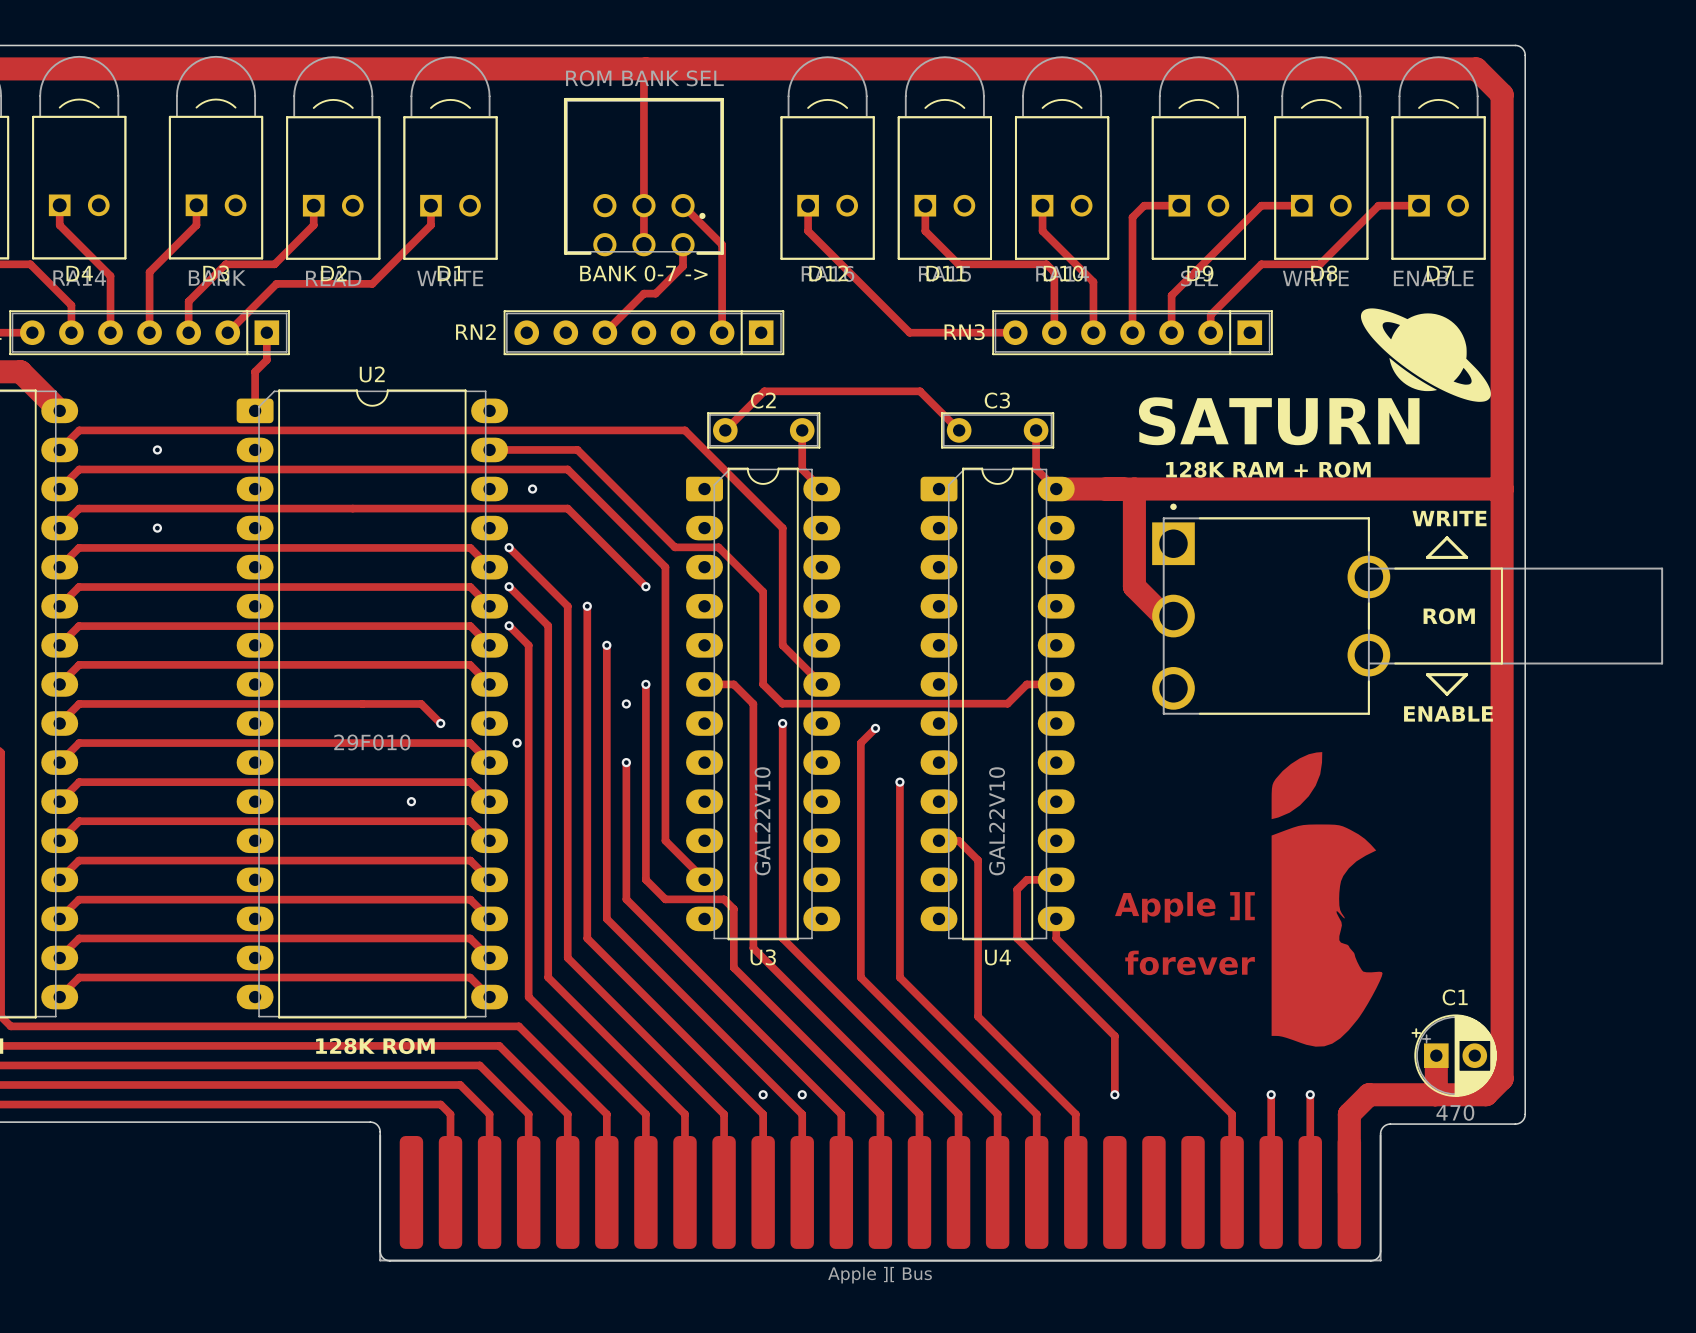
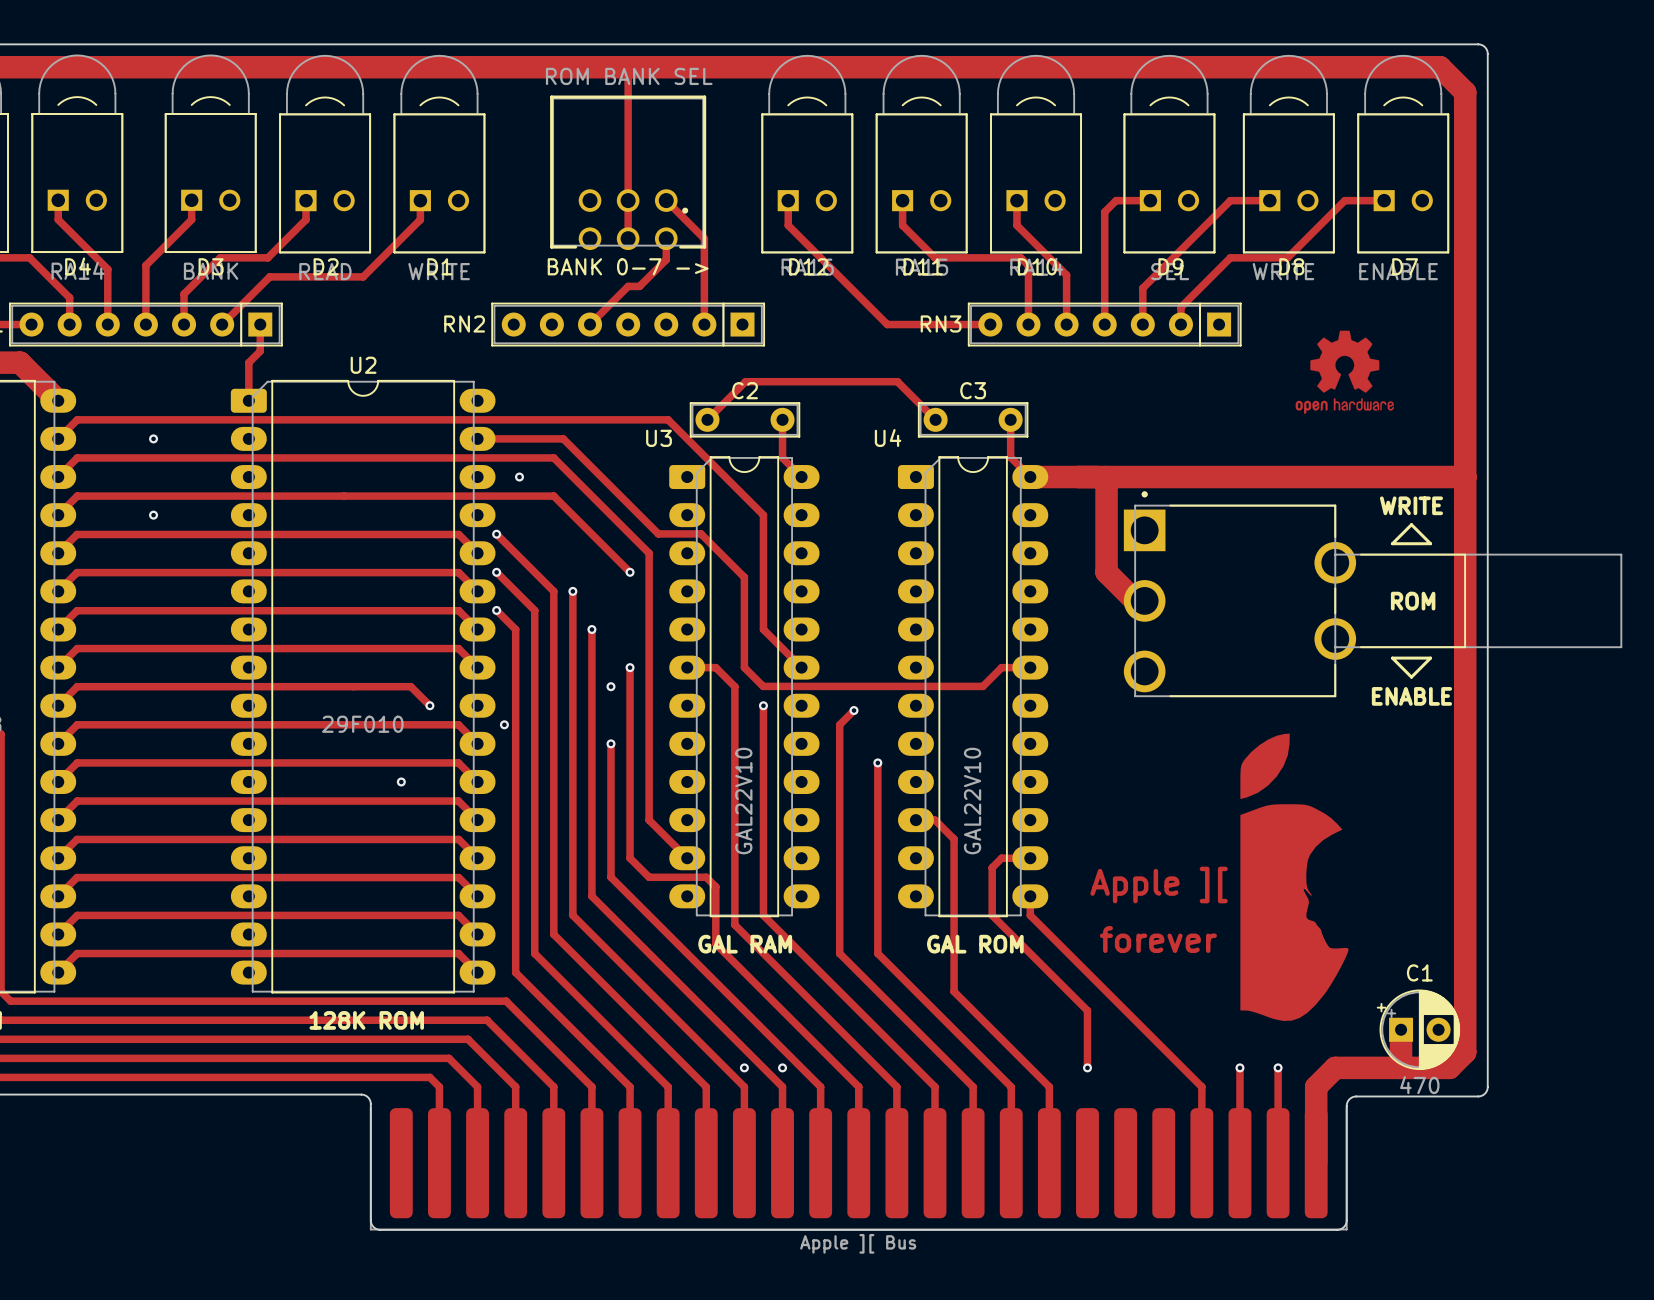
drawing: [1360, 308, 1491, 402] -> none
drawing: none -> [1295, 330, 1394, 414]
text: SATURN (1279, 421) -> none
text: 128K RAM + ROM (1268, 469) -> none
U3 name position: U3 (763, 957) -> U3 (658, 438)
U4 name position: U4 (997, 957) -> U4 (888, 437)
text: none -> GAL RAM (745, 944)
text: none -> GAL ROM (975, 944)

